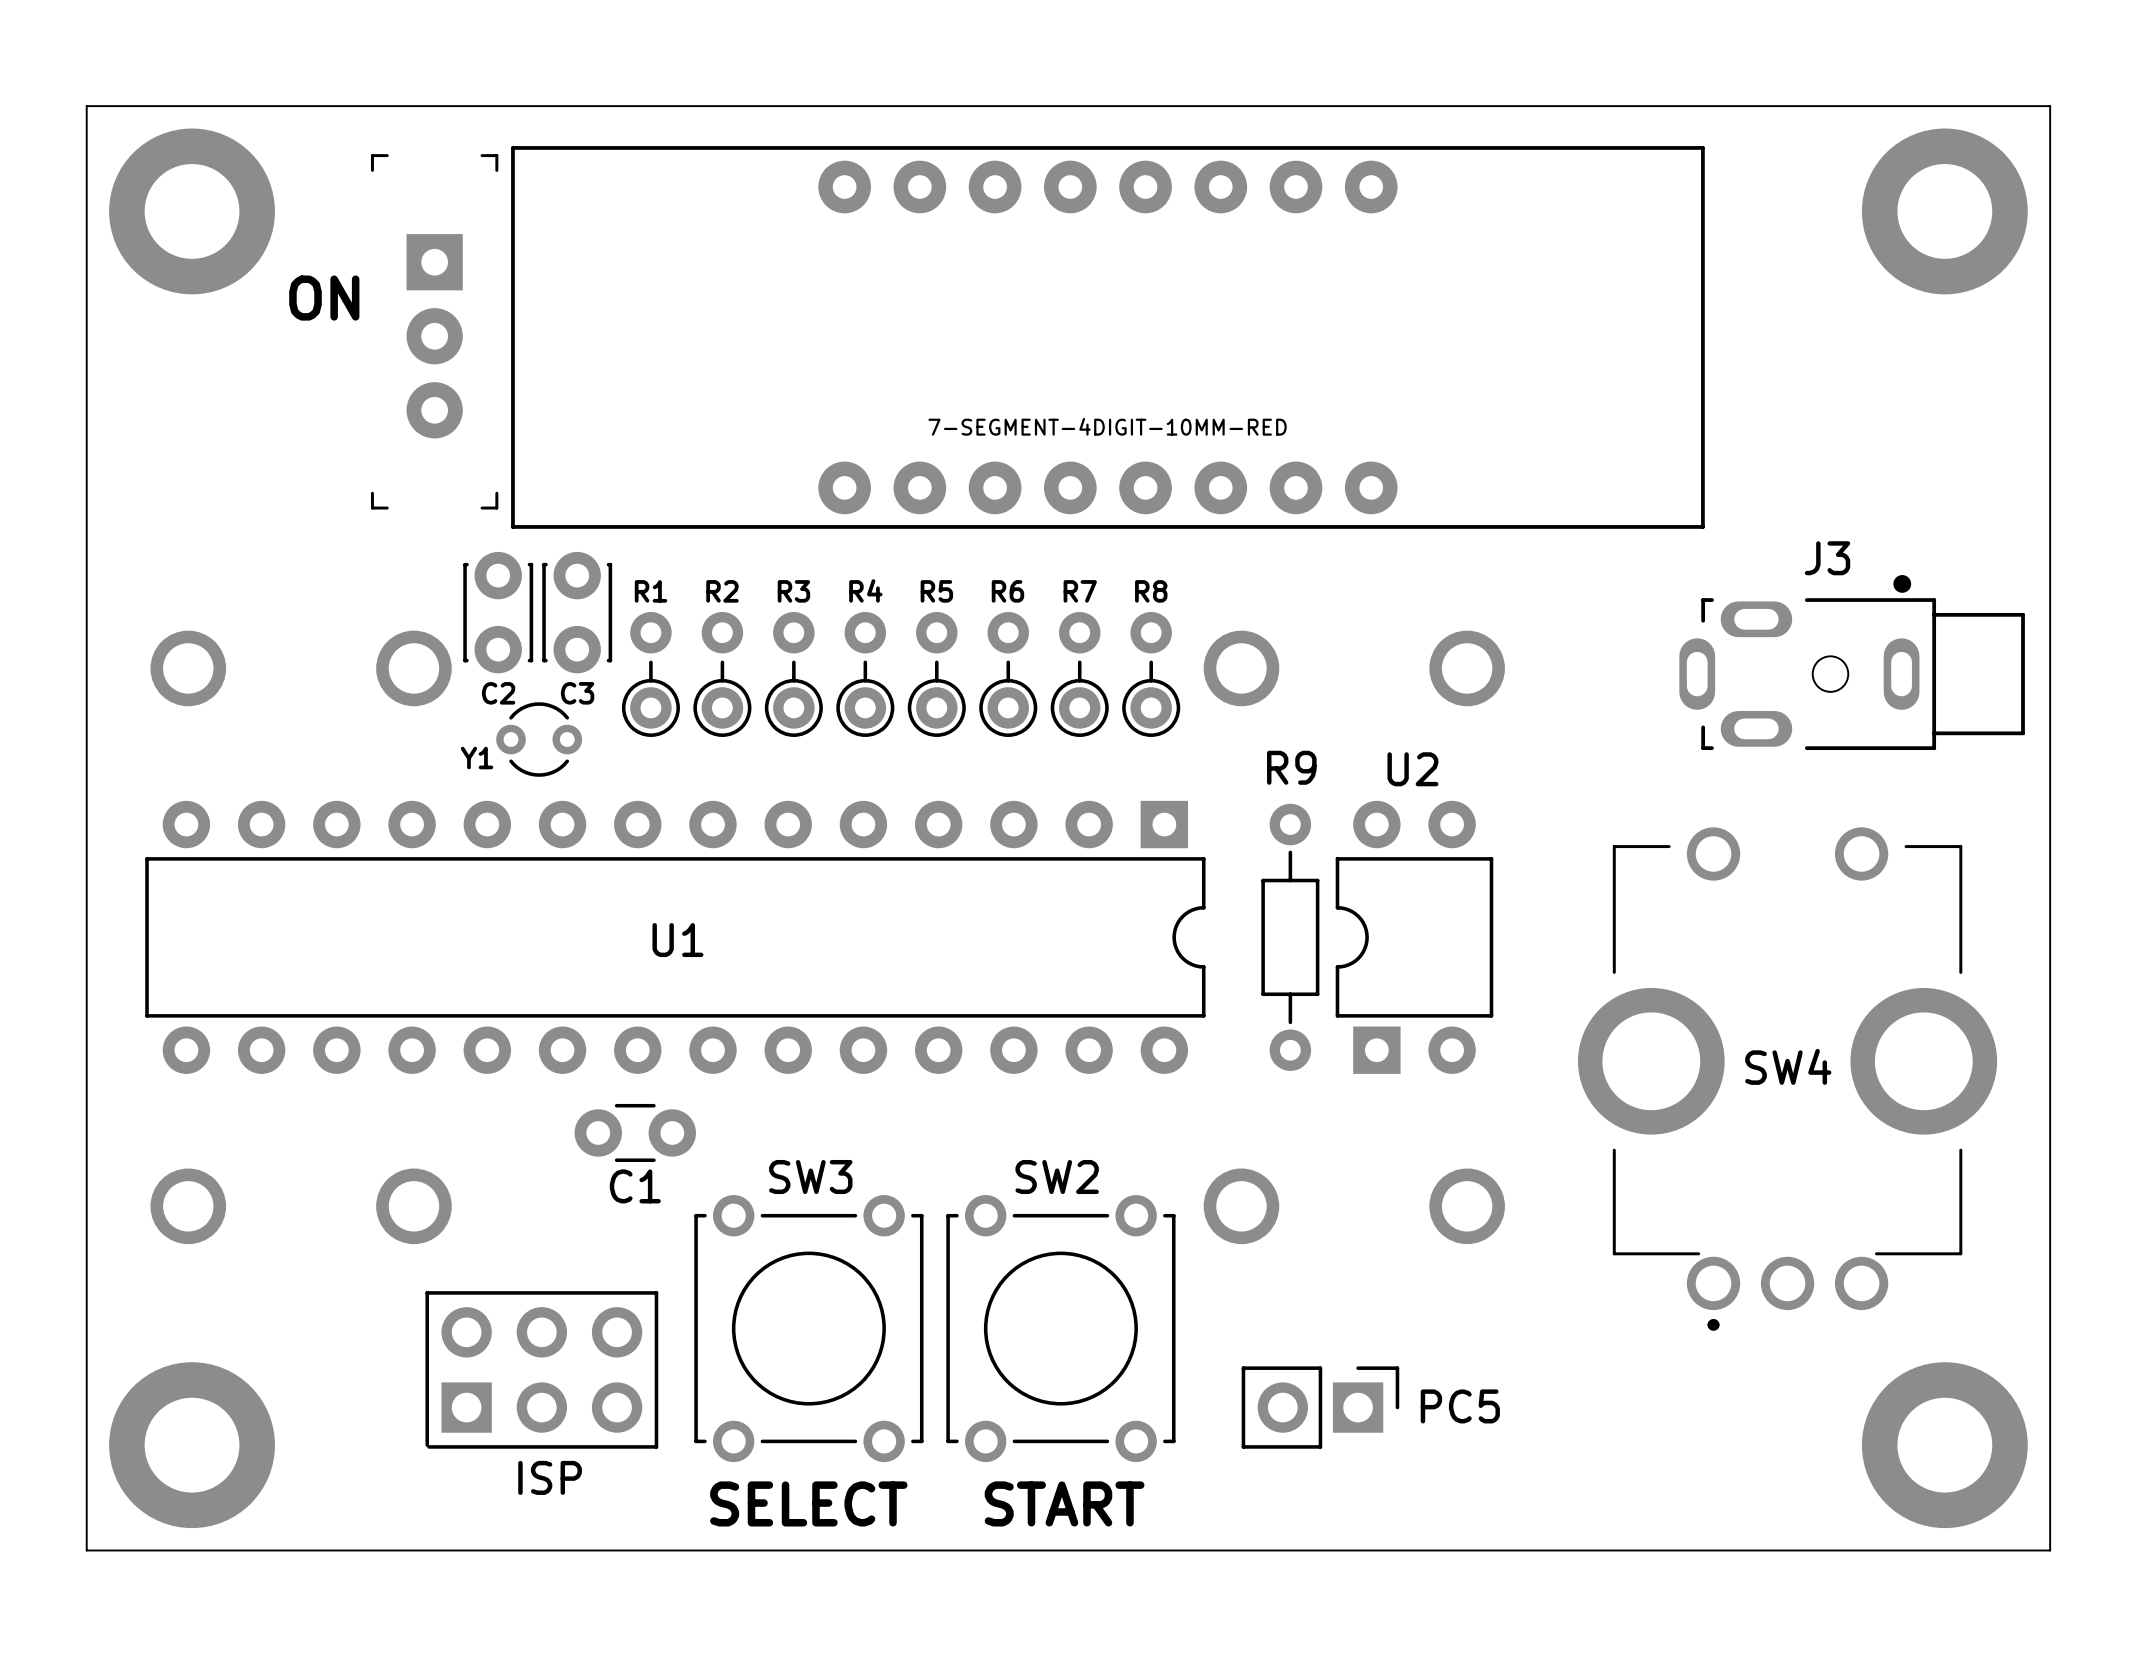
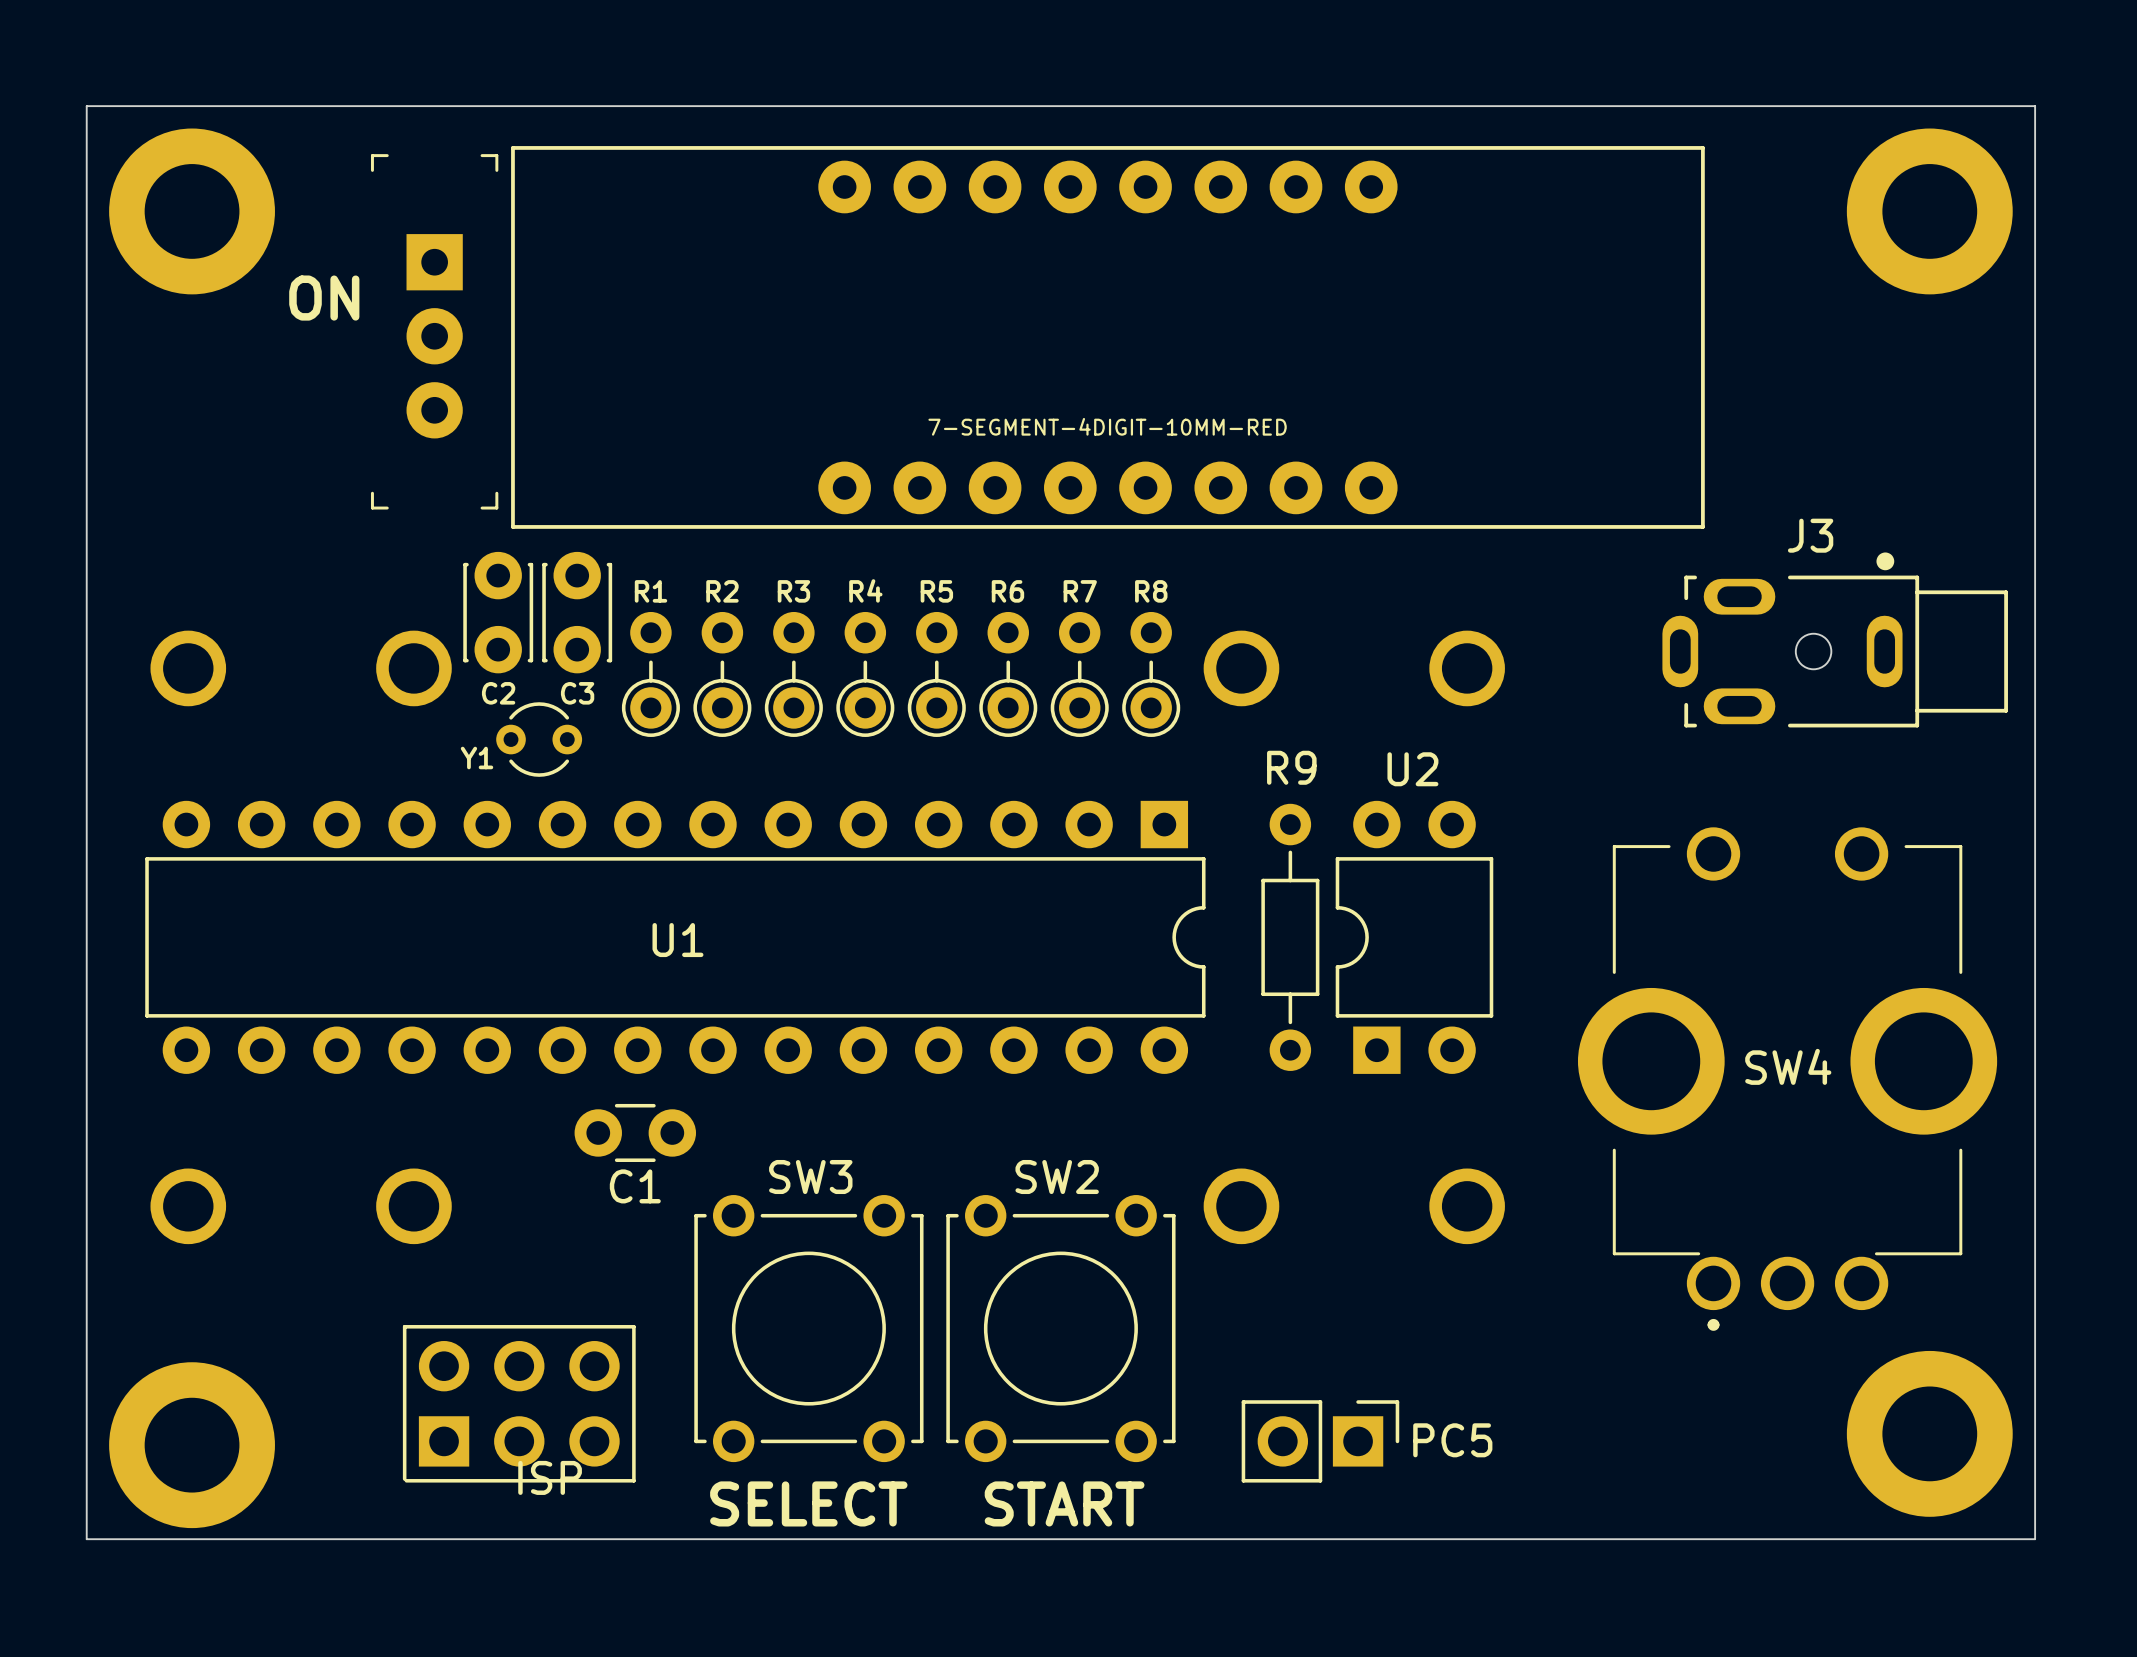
board edge: (2035, 106) (2050, 106) (2050, 1550) (86, 1550) (86, 1539) -> (2035, 106) (2035, 1539) (86, 1539)
part position: (1944, 211) -> (1929, 211)
J3 position: (1852, 662) -> (1835, 639)
part position: (541, 1369) -> (519, 1403)
text position: PC5 (1460, 1406) -> PC5 (1452, 1440)
part position: (1320, 1407) -> (1320, 1441)
part position: (1944, 1445) -> (1929, 1433)

